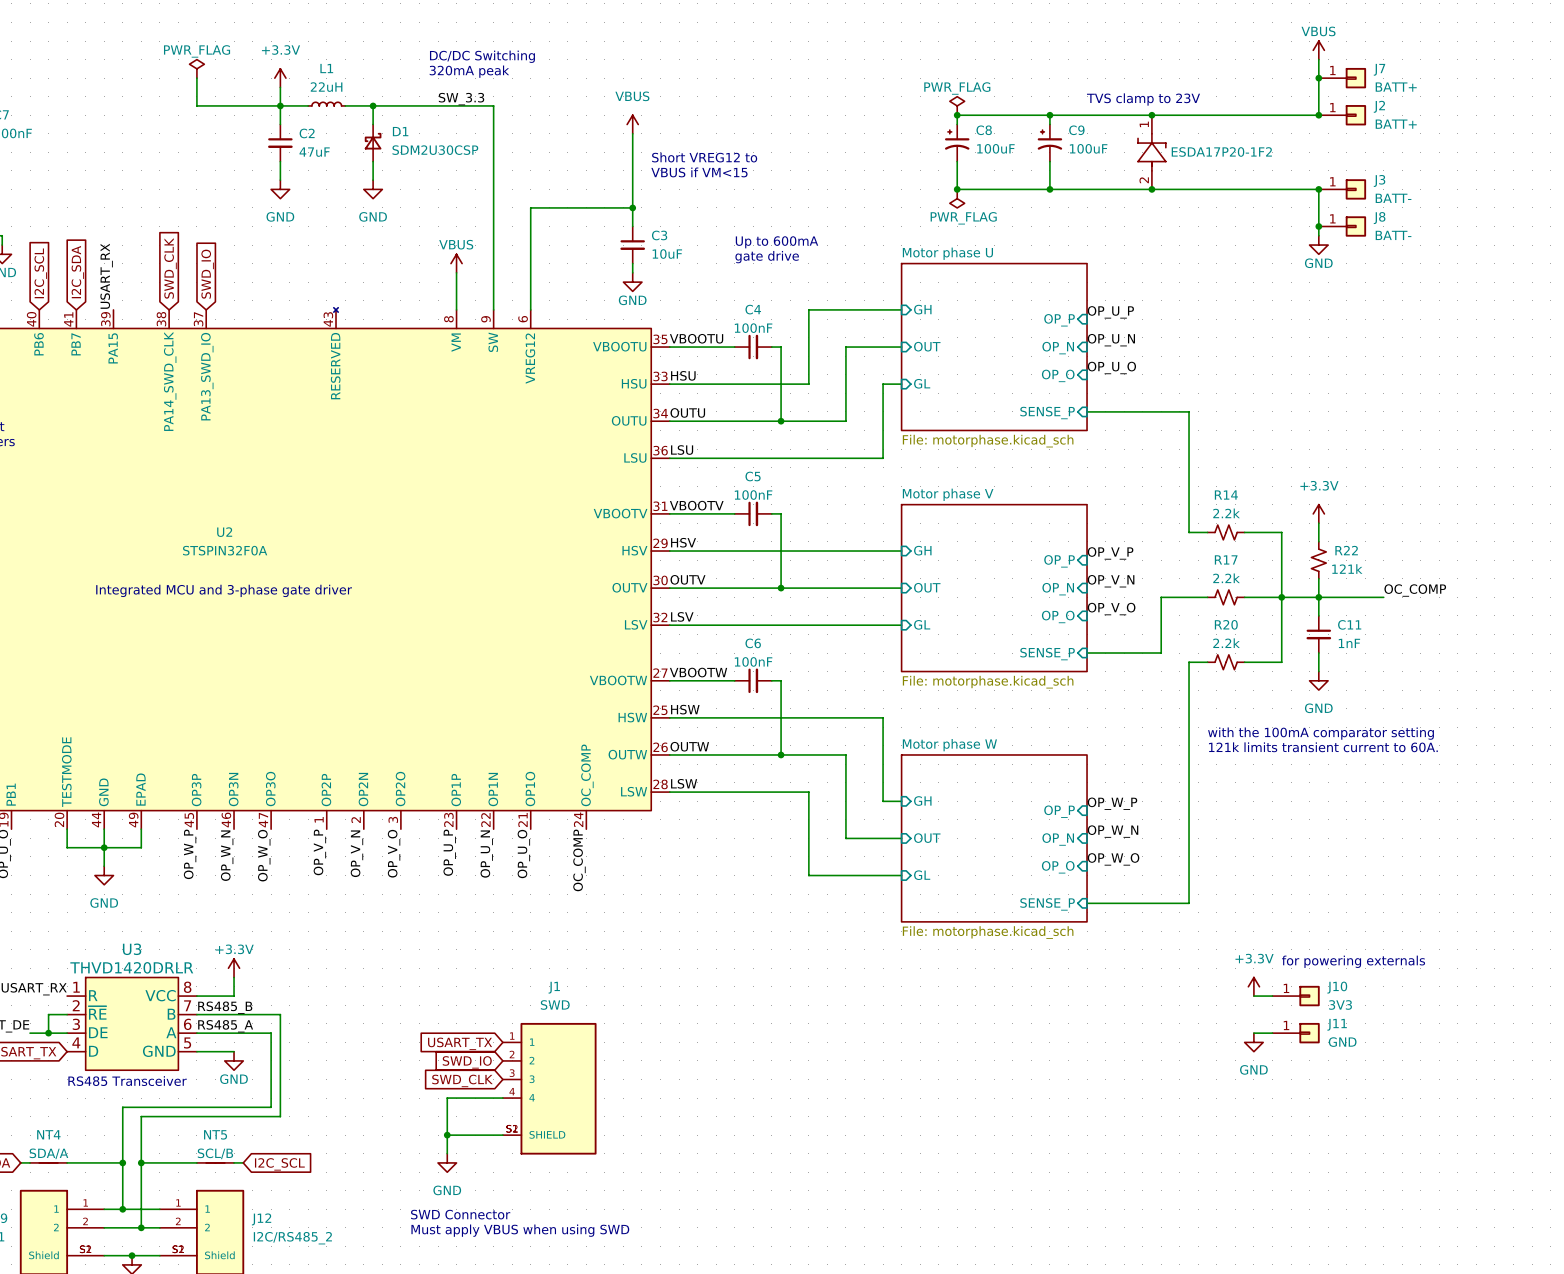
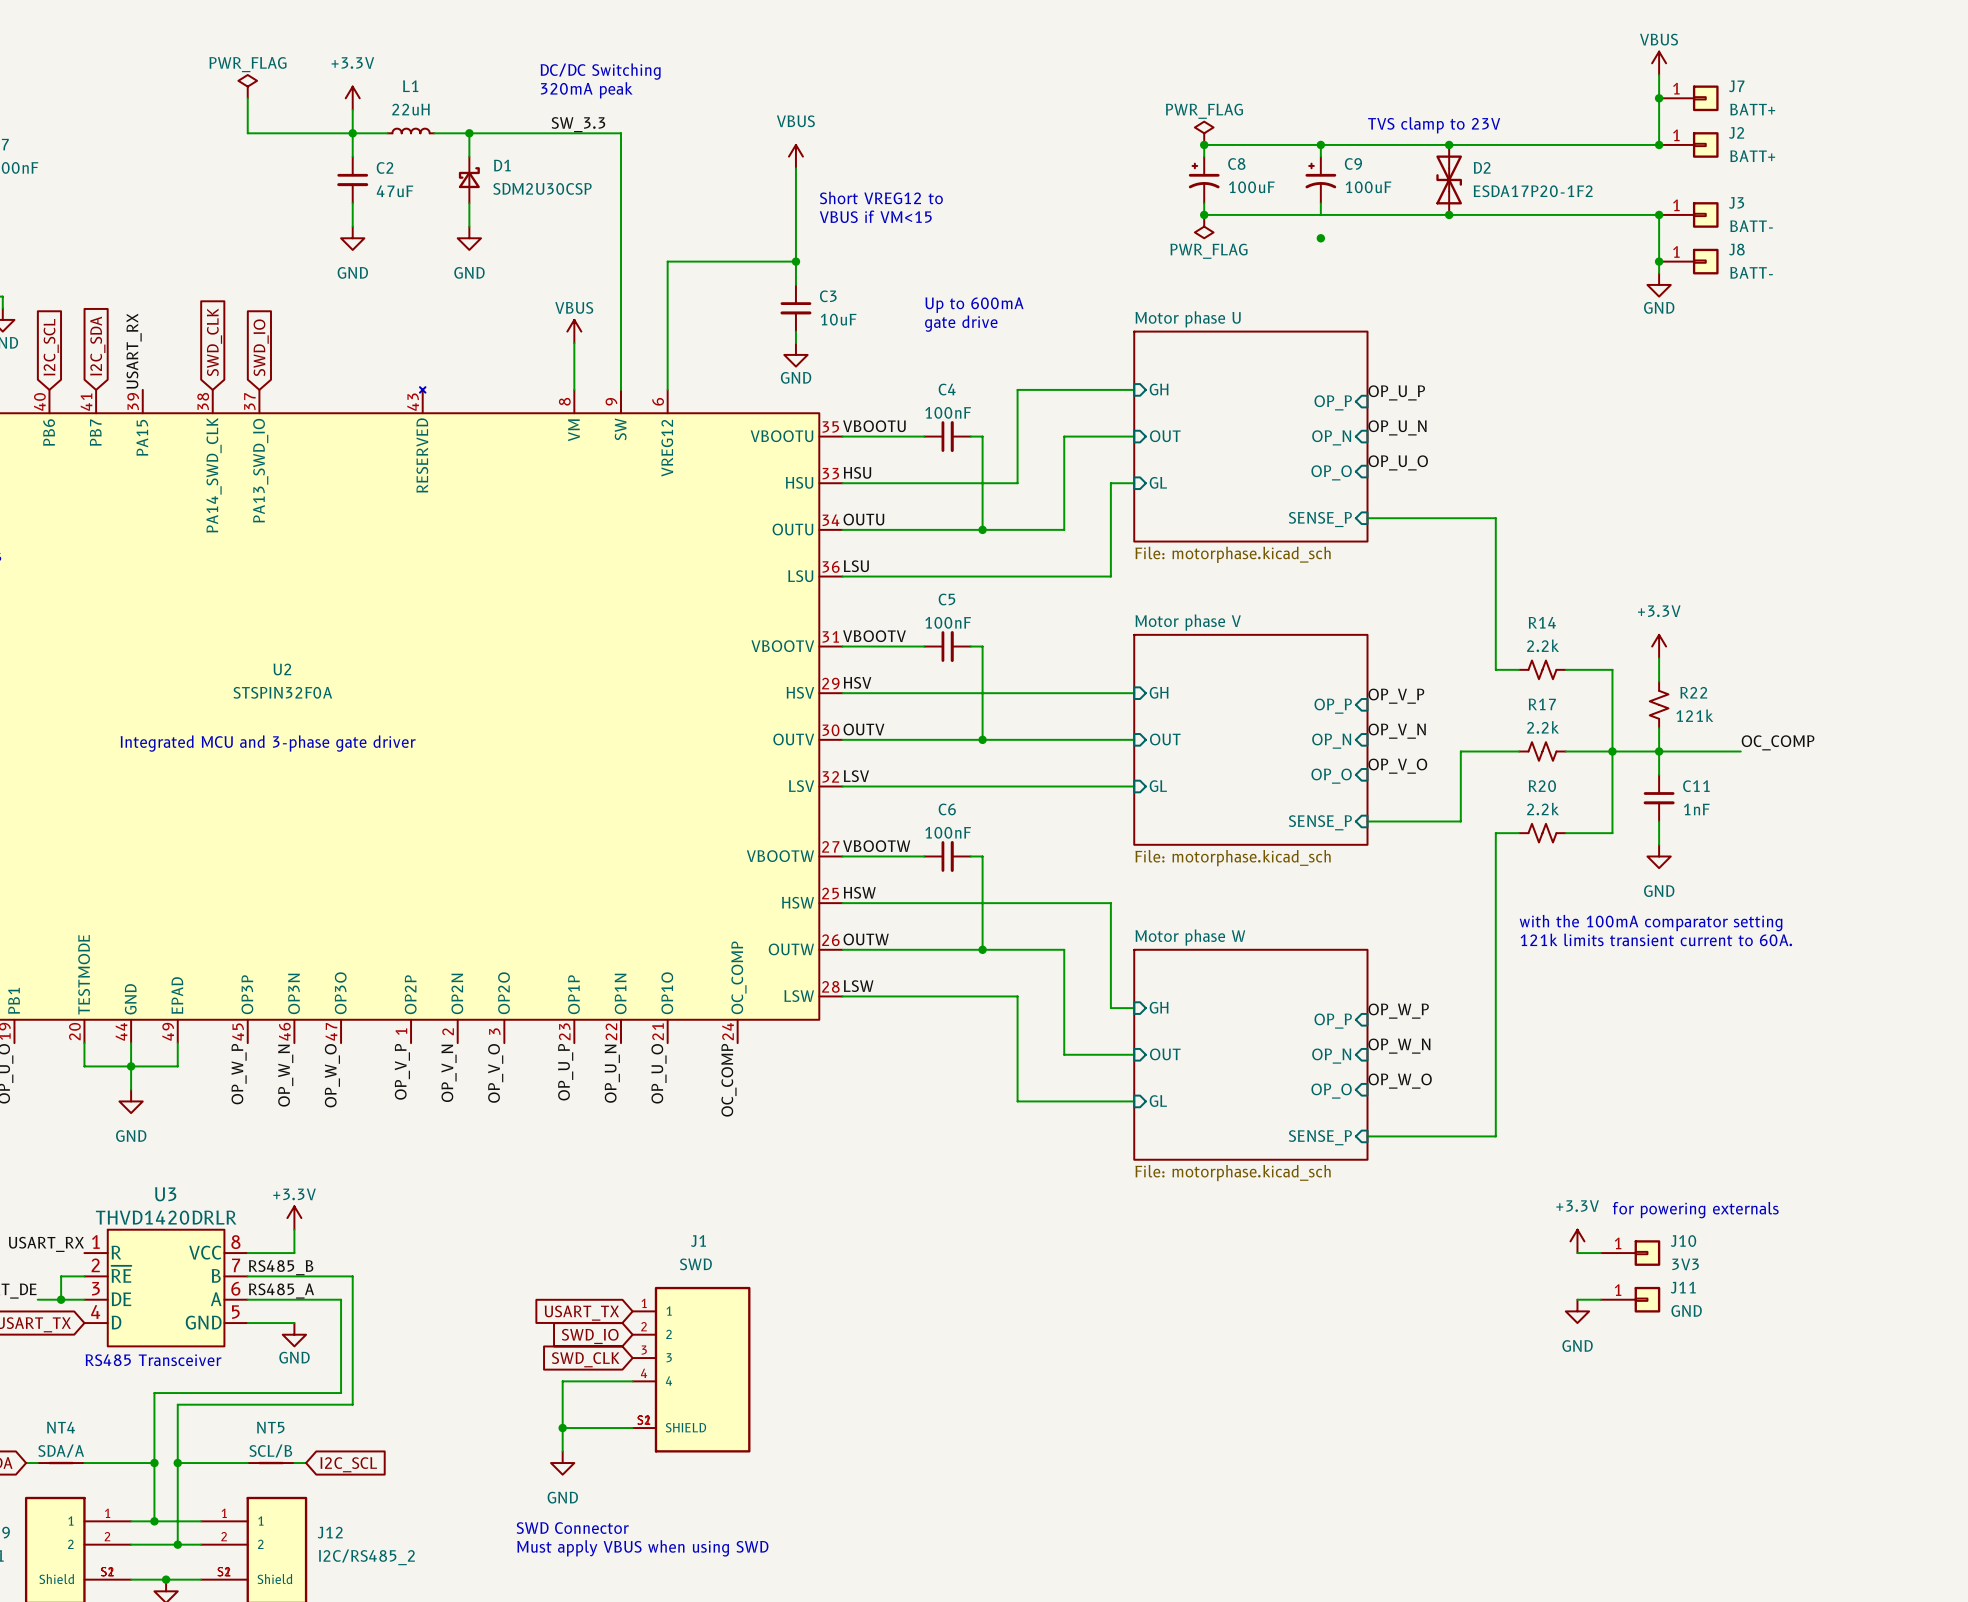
D2: none -> ESDA17P20-1F2 (1449, 179)
part: ESDA17P20-1F2 (1151, 152) -> none
wire: (957, 170) (957, 189) (1318, 189) -> (1204, 214) (1659, 214) (1659, 238)
wire: (1049, 170) (1049, 189) -> none
junction: none -> (1659, 214)
junction position: (957, 189) -> (1204, 214)
junction position: (1151, 189) -> (1449, 214)
junction: (1318, 189) -> none
J3 position: (1342, 189) -> (1688, 214)
power symbol position: PWR_FLAG (957, 198) -> PWR_FLAG (1204, 226)
junction: none -> (1659, 261)
junction: (1318, 226) -> none
J8 position: (1342, 226) -> (1688, 261)
power symbol position: GND (1318, 245) -> GND (1659, 284)

